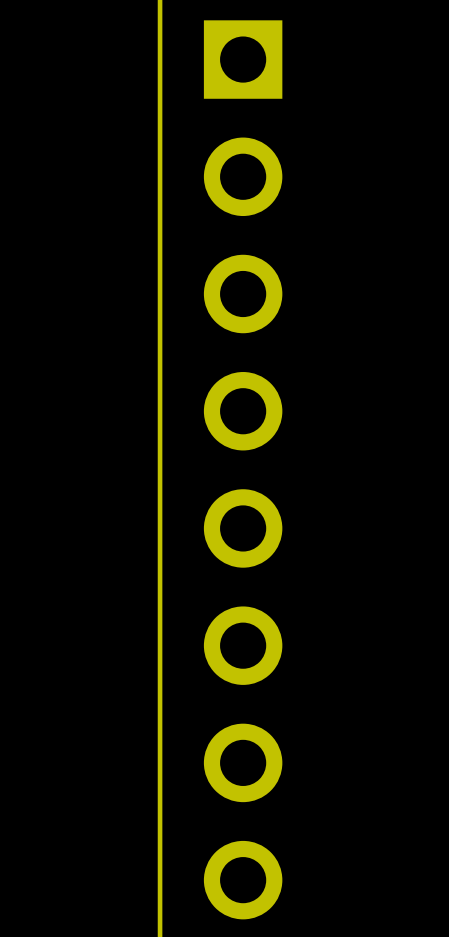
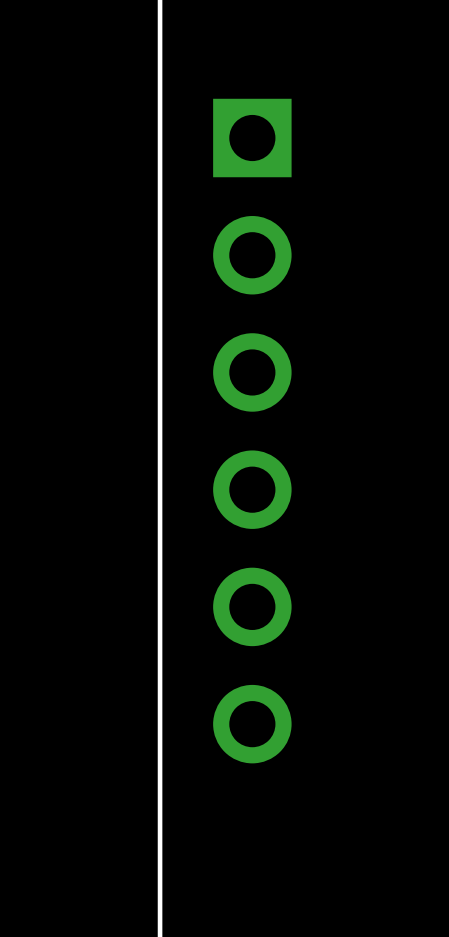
part footprint: [203, 20, 283, 920] -> [213, 98, 292, 764]

